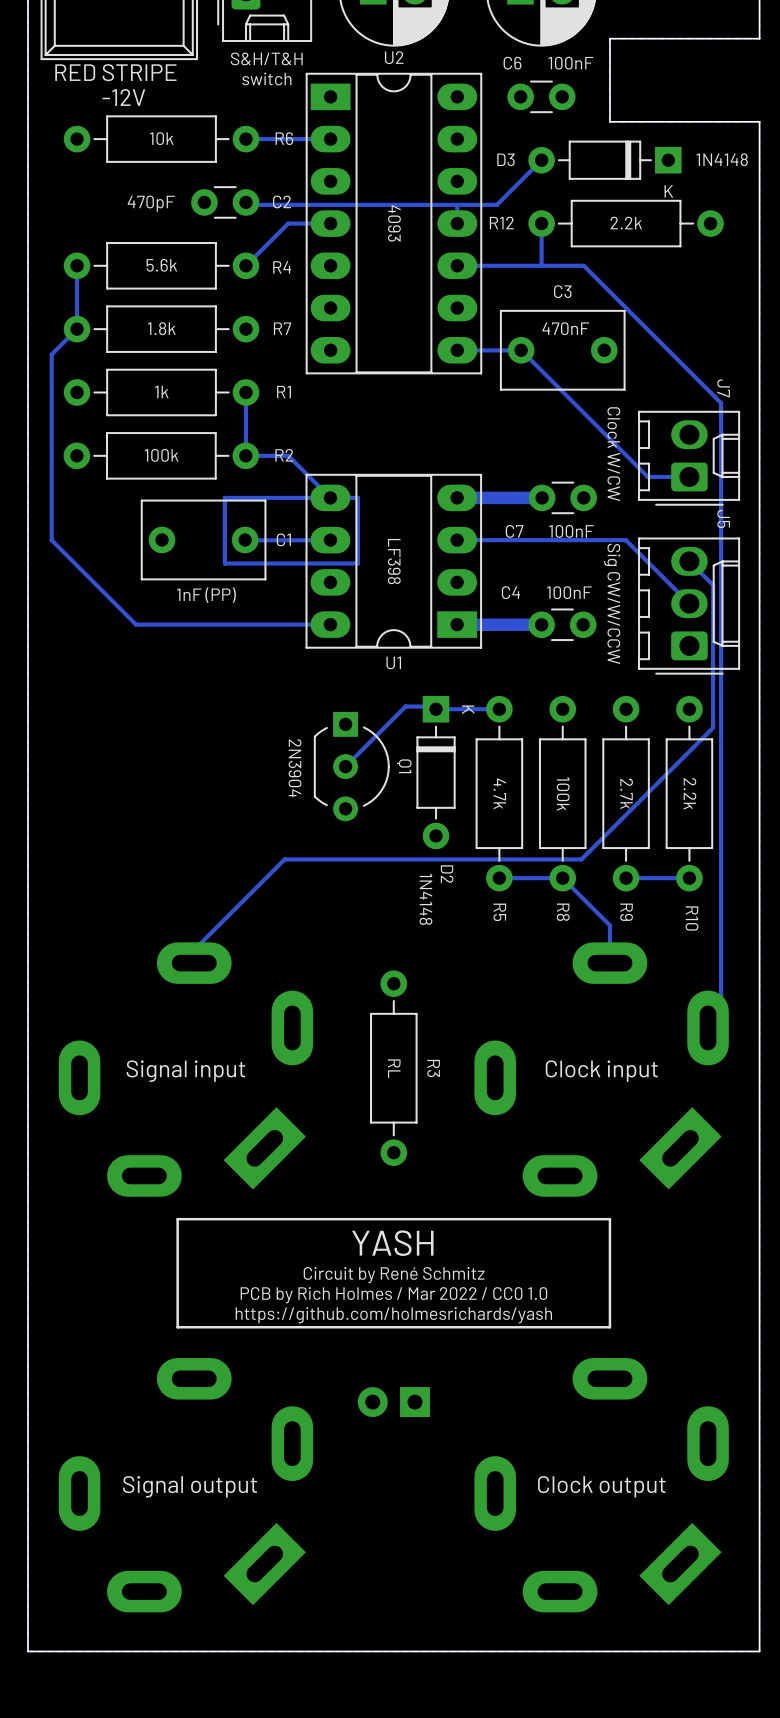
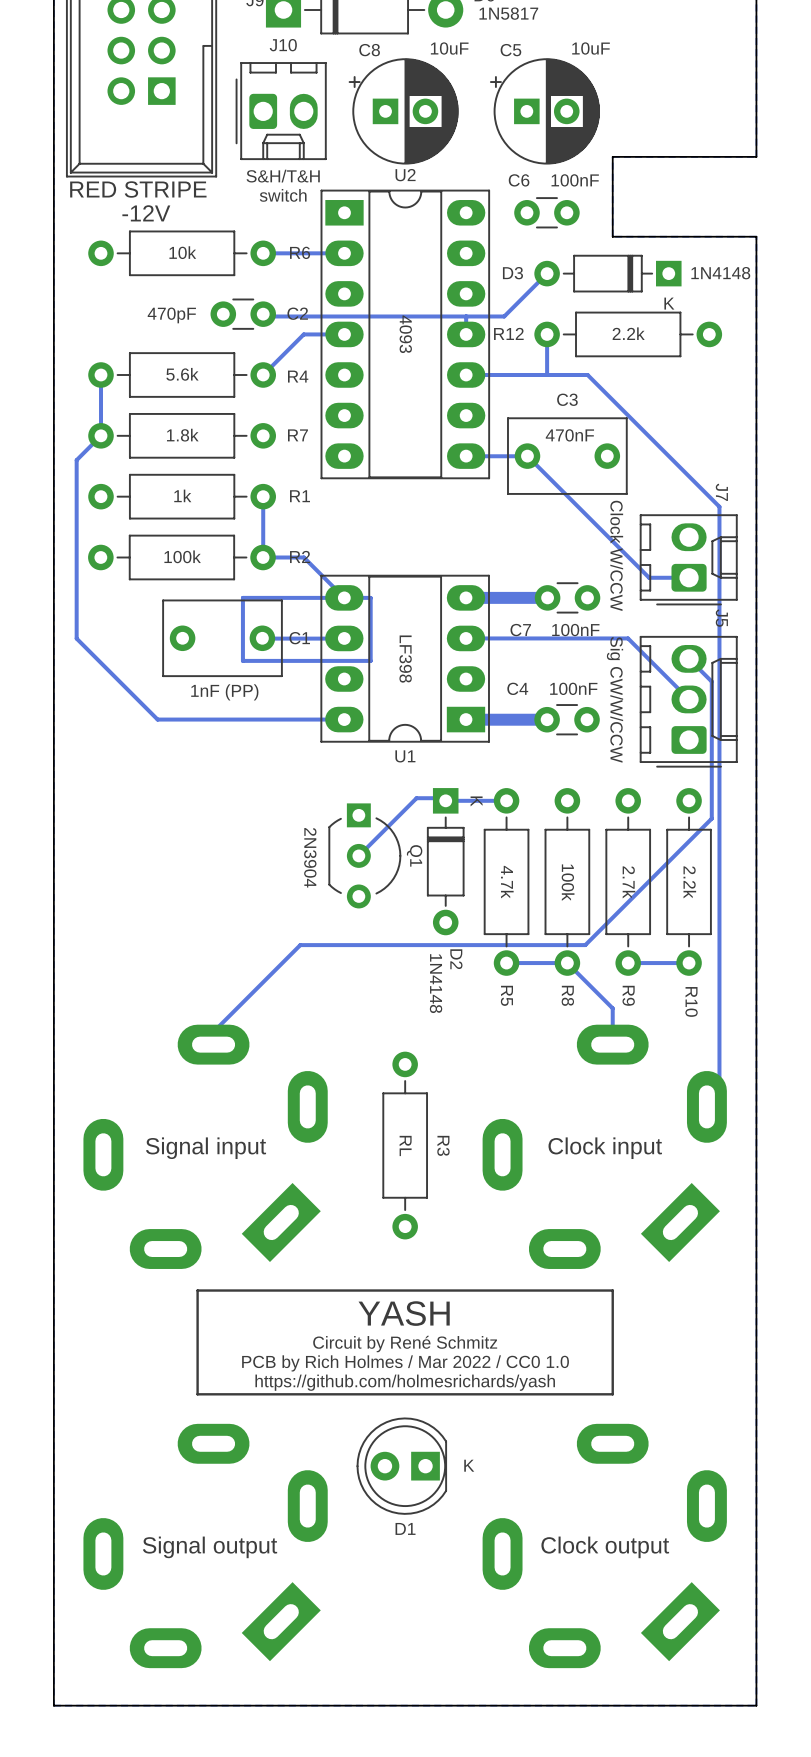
text: Clock W/CW (613, 454) -> Clock W/CCW (616, 555)
D1 side: top (393, 1402) -> bottom (401, 1466)

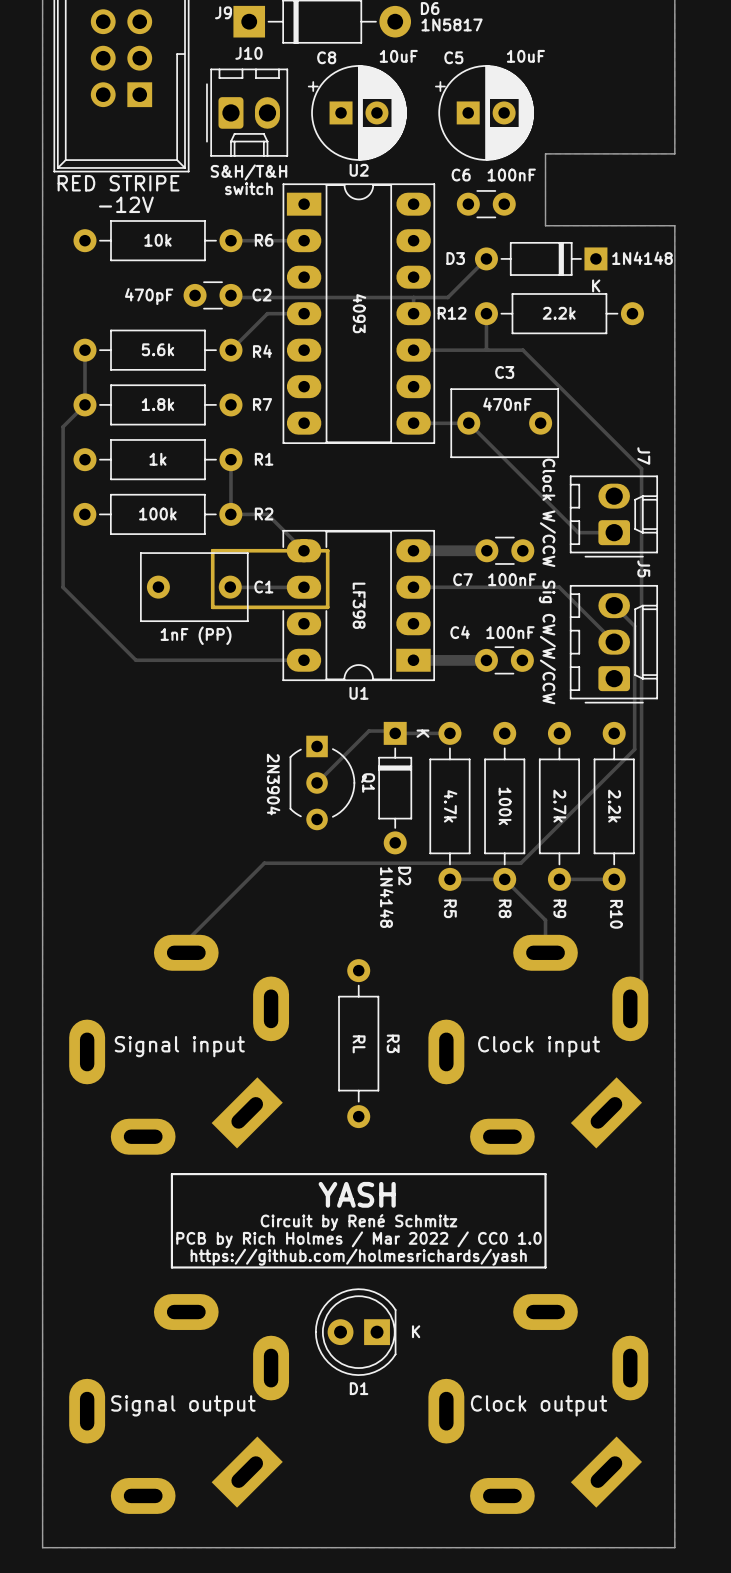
U1 footprint: [320, 574, 490, 743] -> [210, 529, 436, 682]
track: (370, 597) (243, 597) -> none
track: (370, 598) (370, 660) (242, 660) (242, 598) -> none

